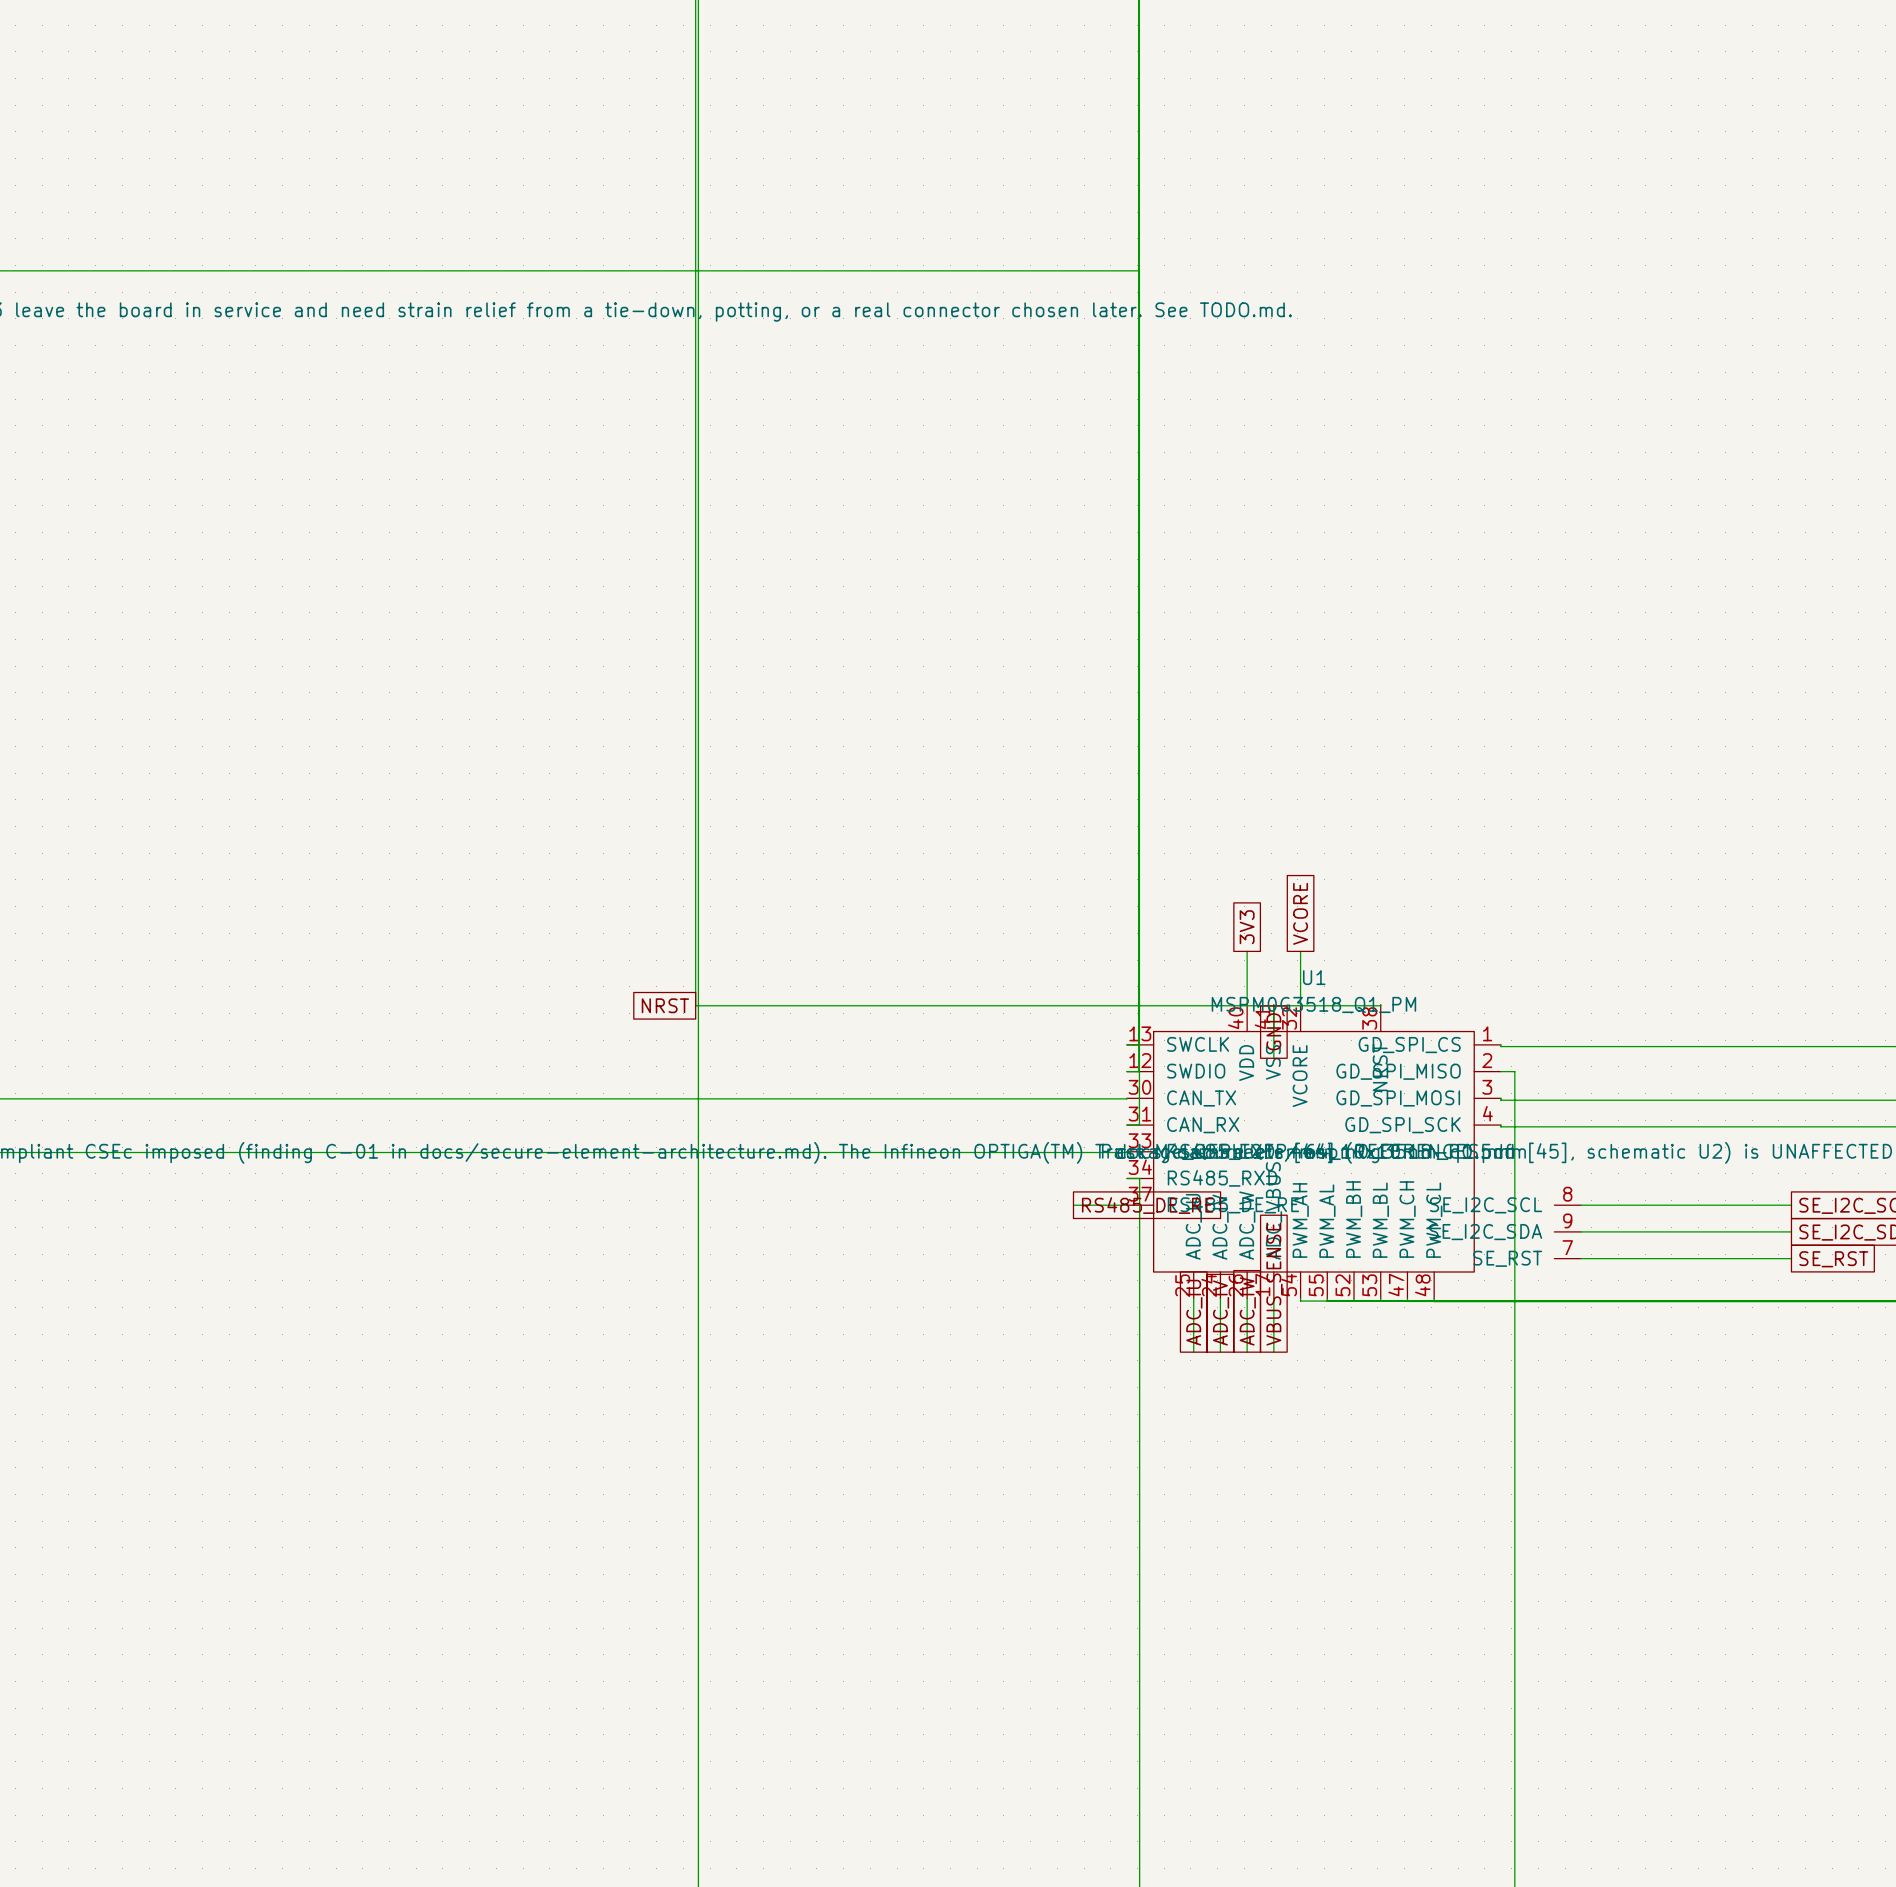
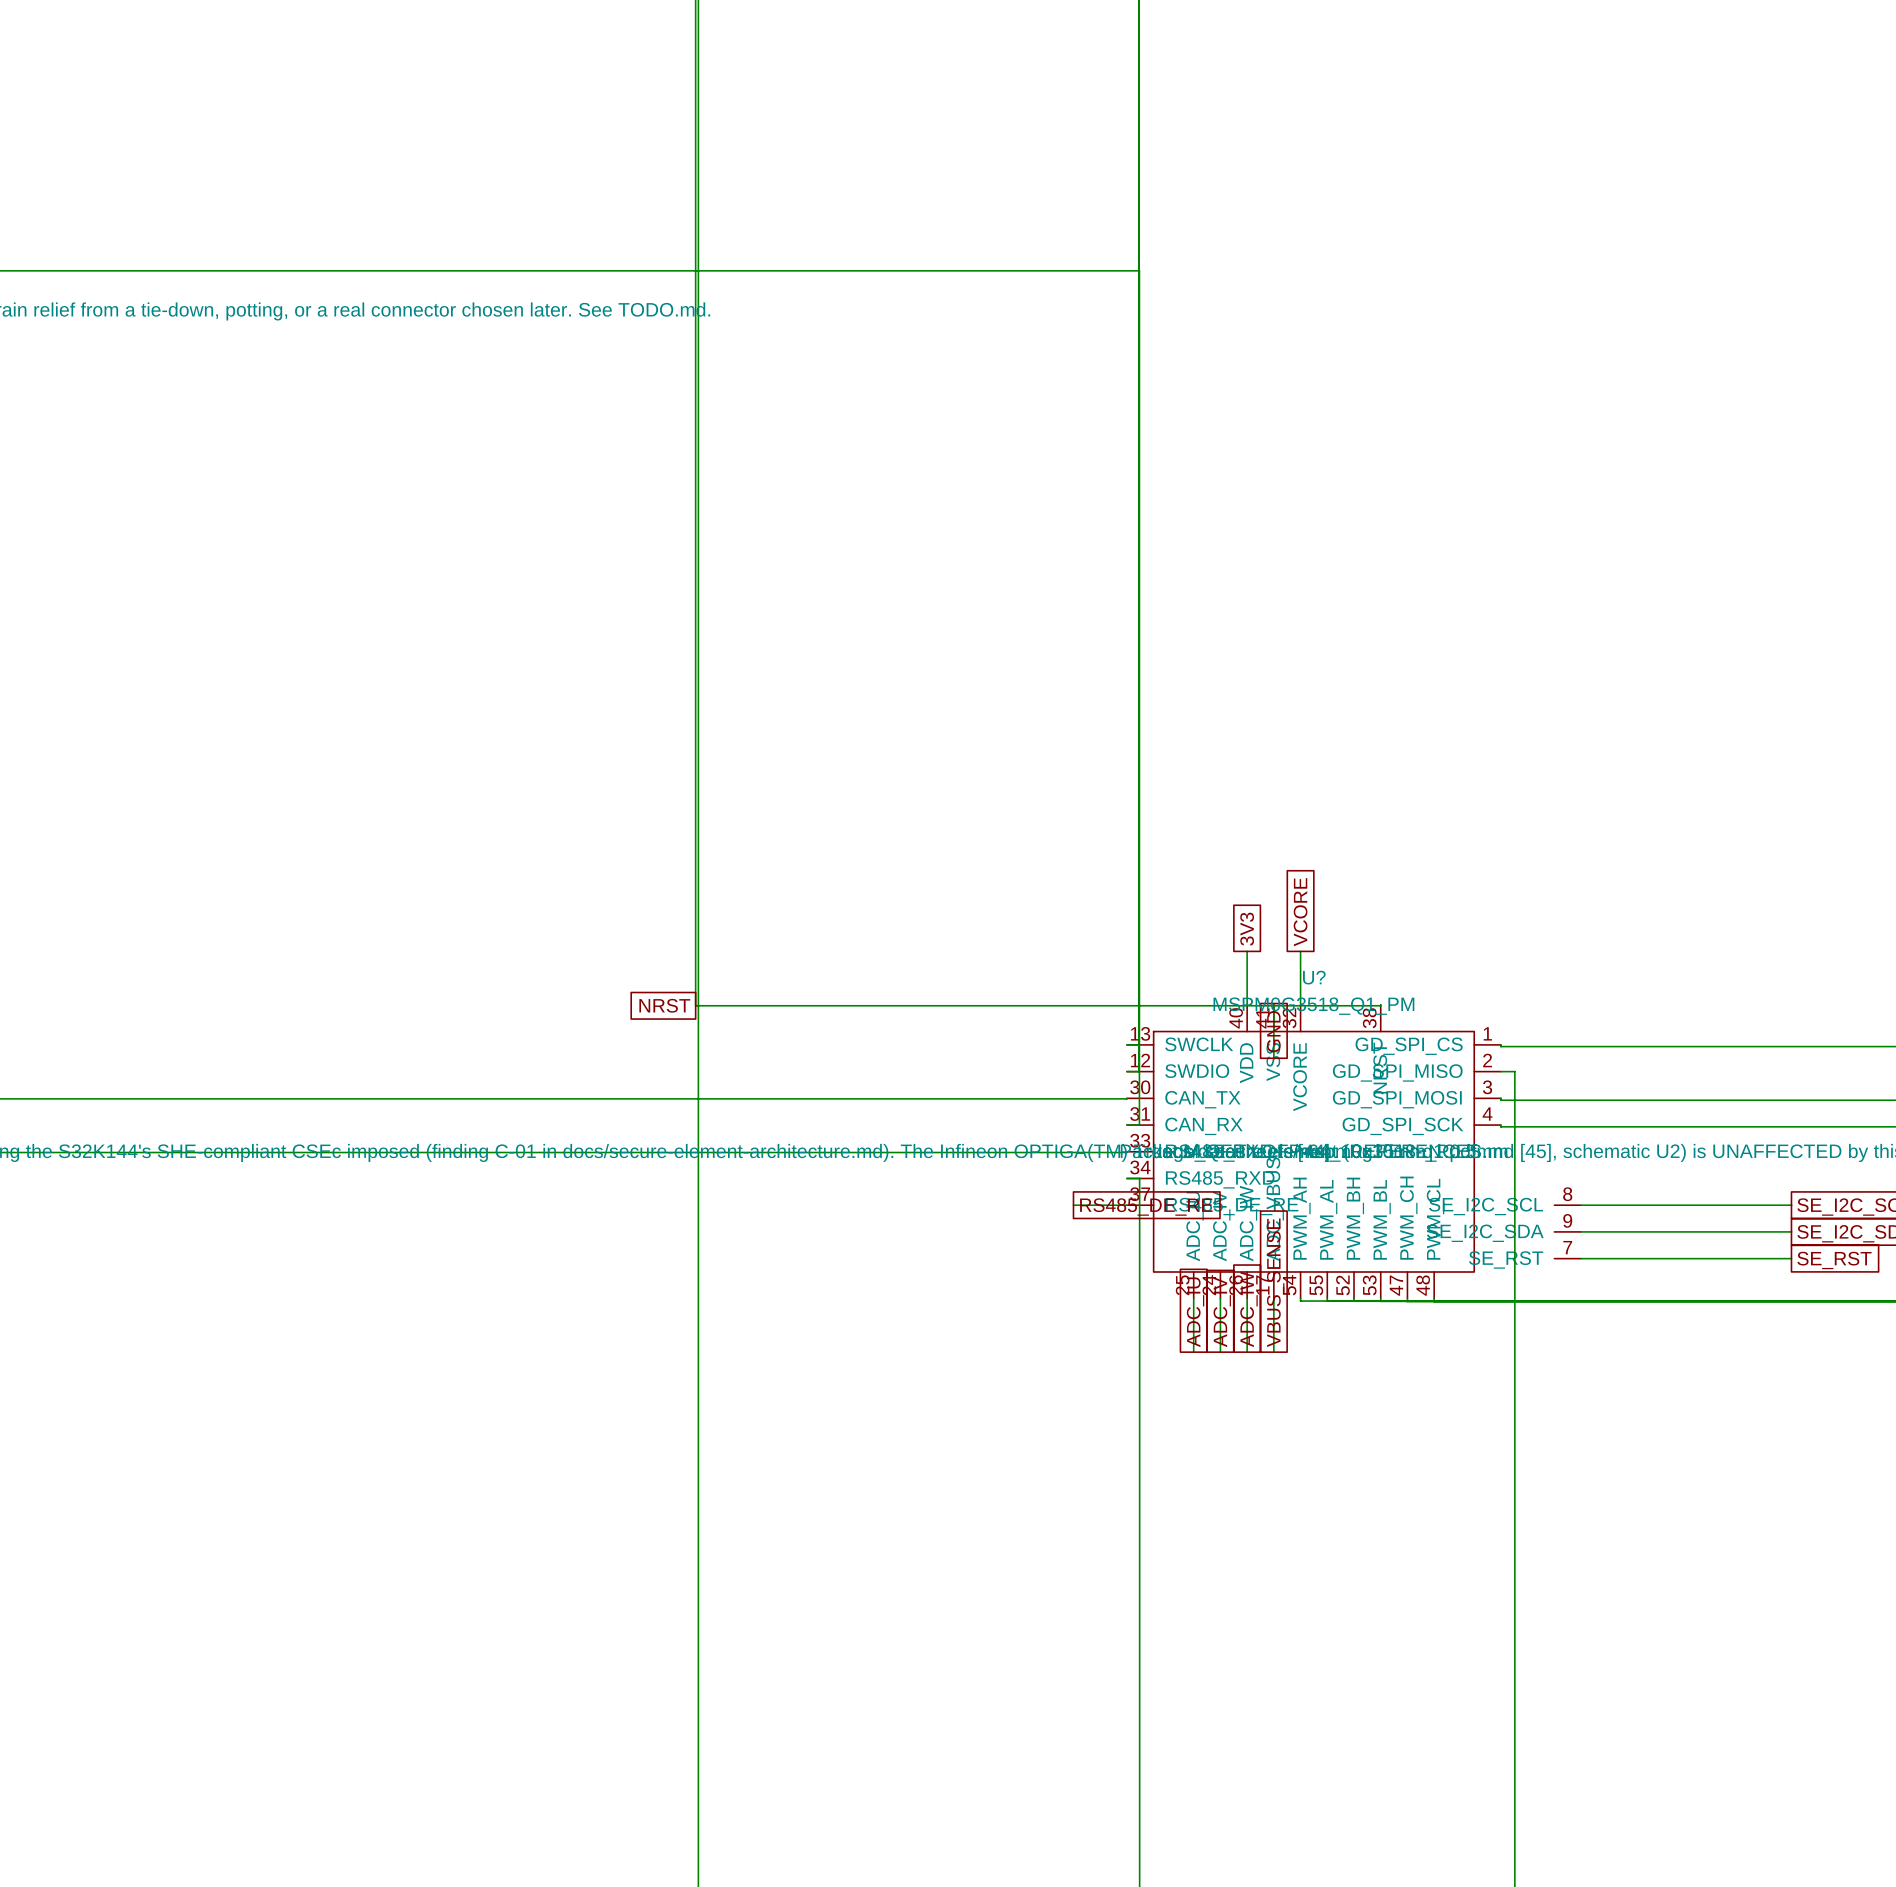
U1 name: U1 (1314, 977) -> U? (1314, 977)

